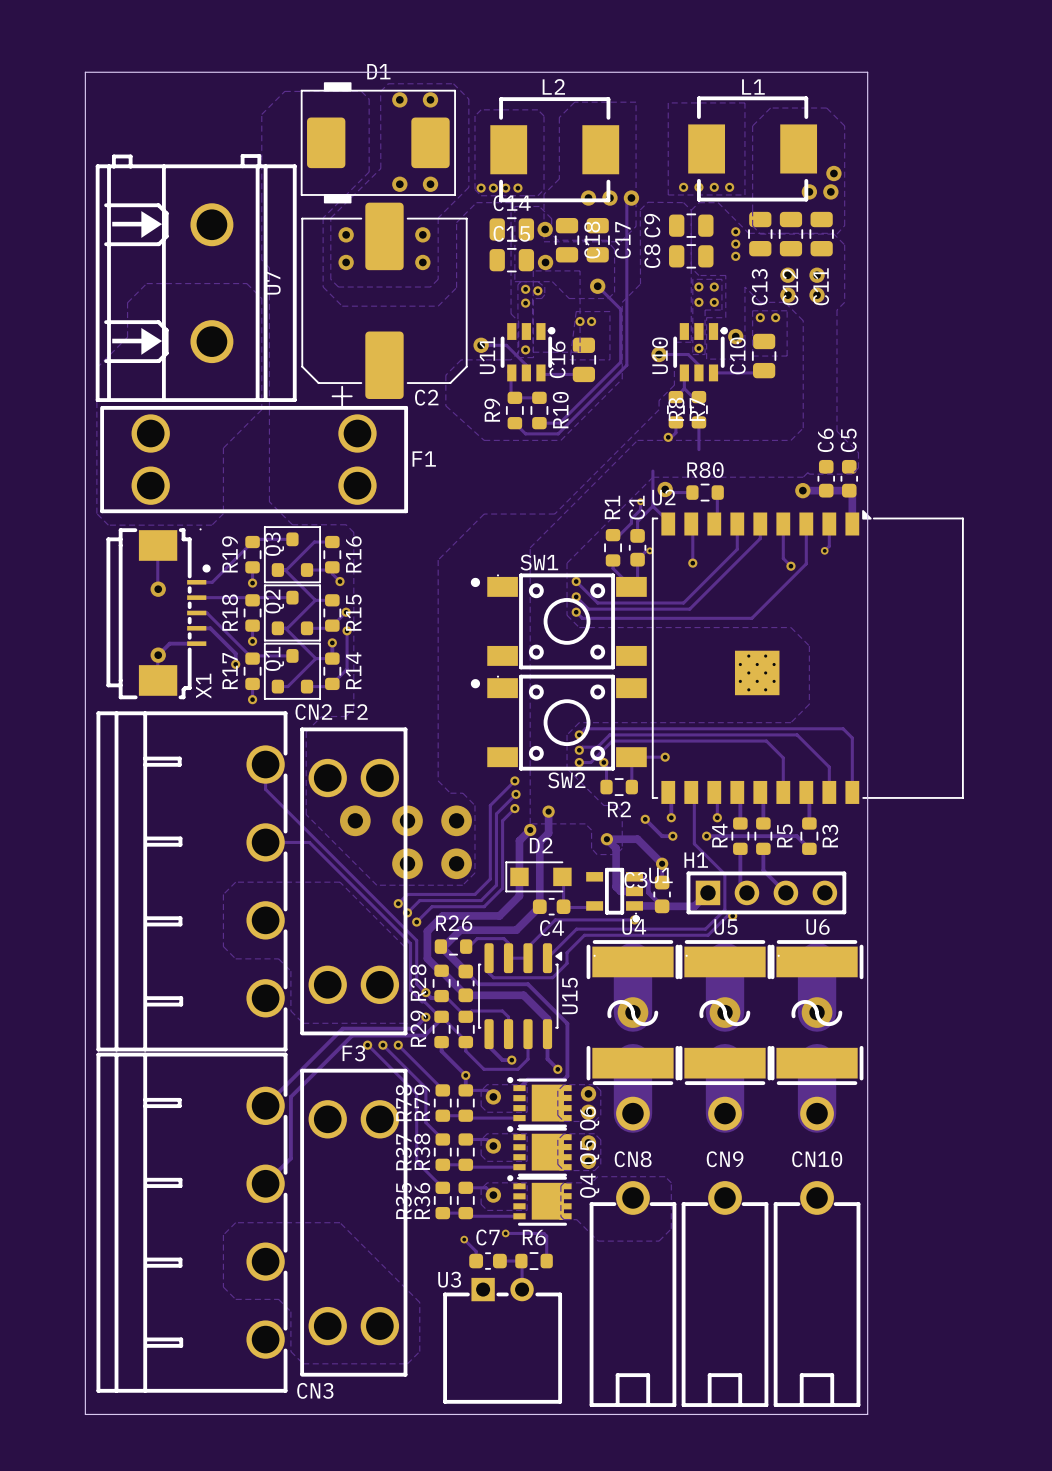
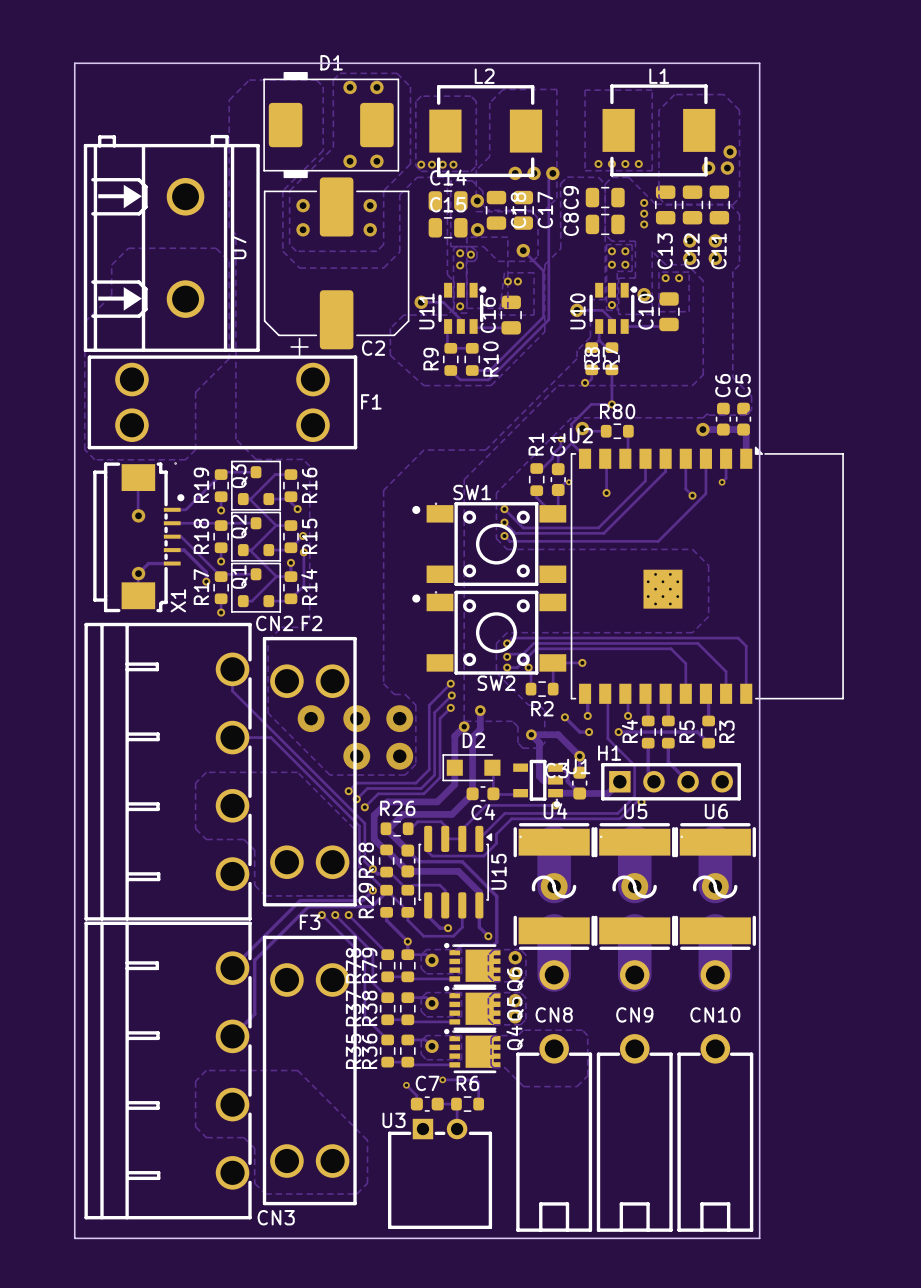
via: none -> (611, 404)
track: (652, 471) (652, 484) -> (611, 393) (611, 404) (591, 404) (571, 424)

